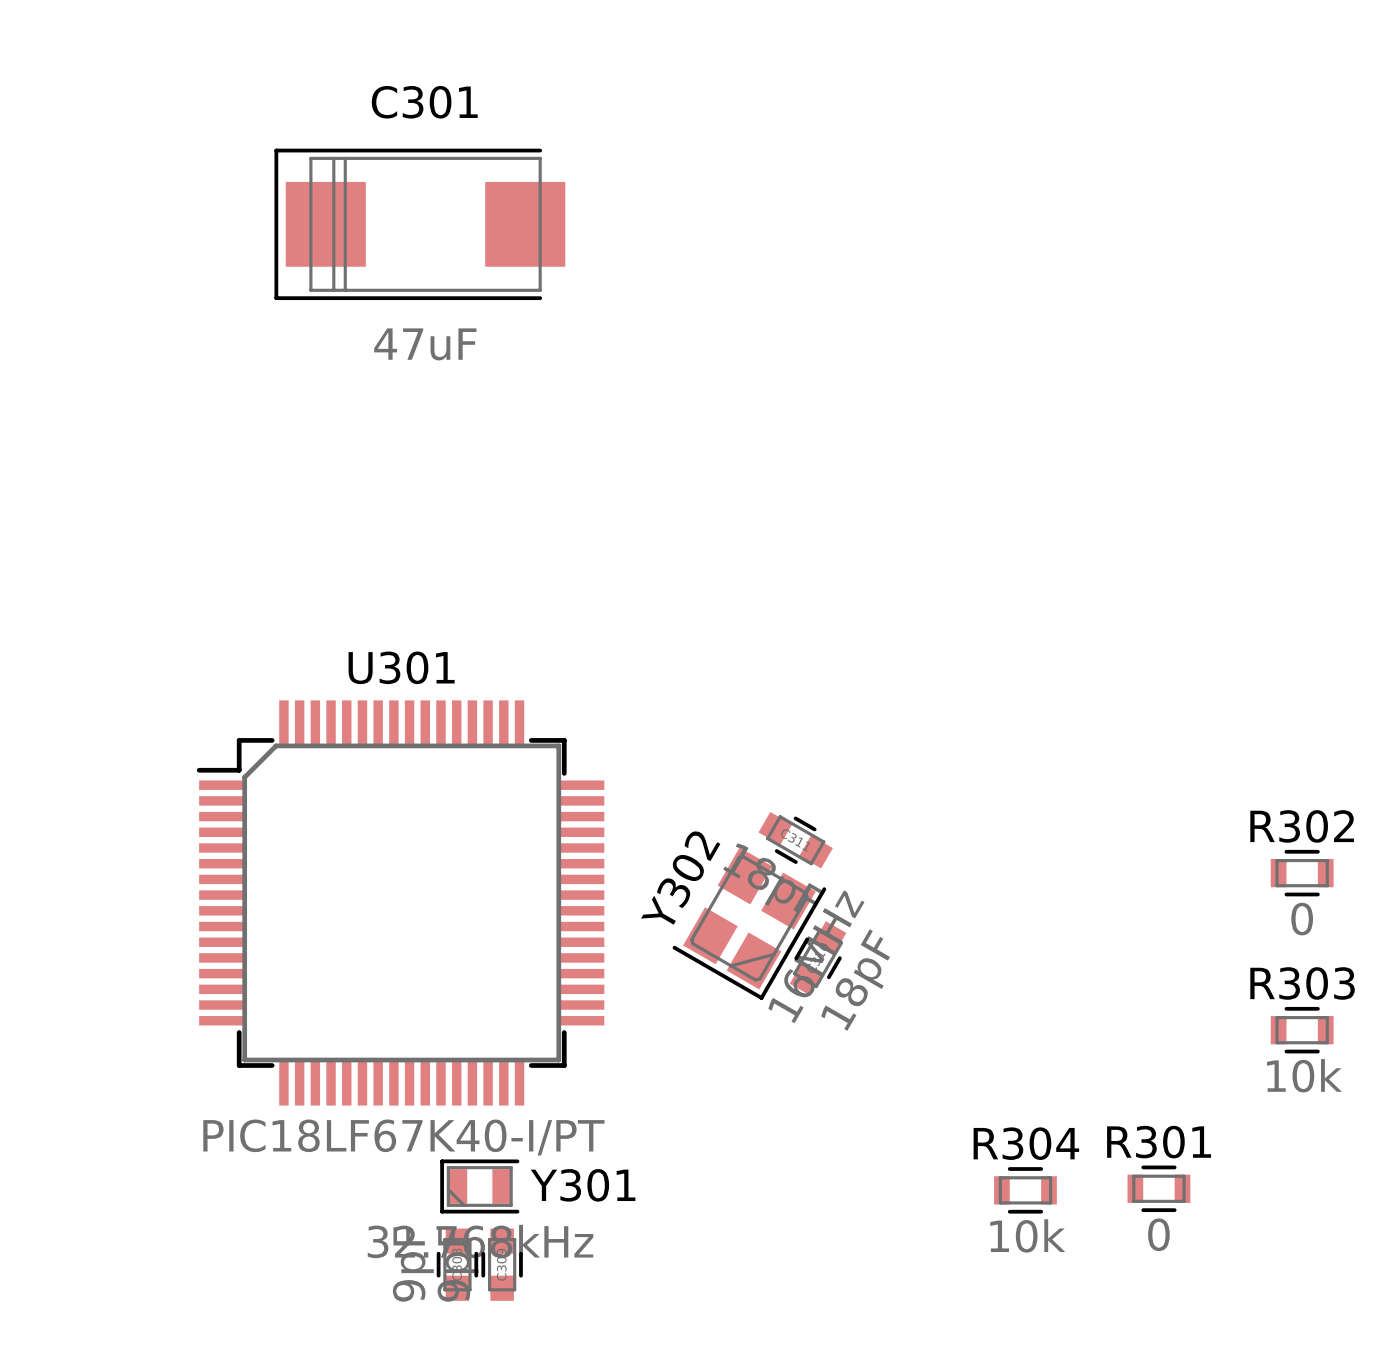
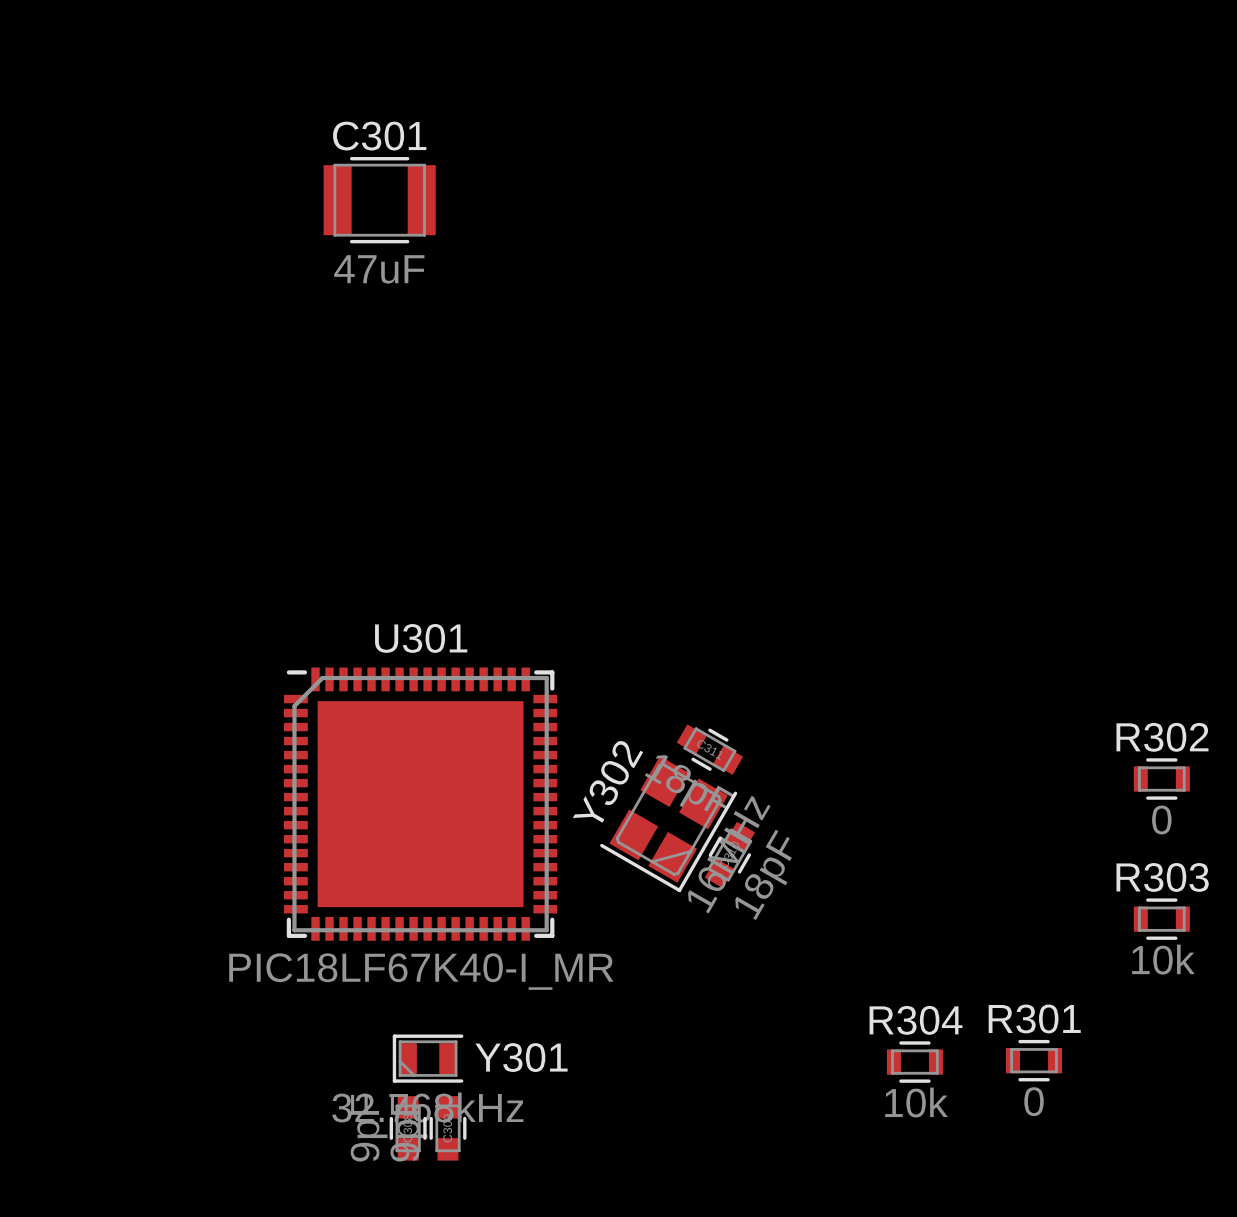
C301 footprint: [274, 148, 566, 301] -> [323, 157, 436, 244]
U301 footprint: [196, 700, 605, 1106] -> [283, 667, 558, 941]
U301 value: PIC18LF67K40-I/PT (403, 1137) -> PIC18LF67K40-I_MR (421, 971)

